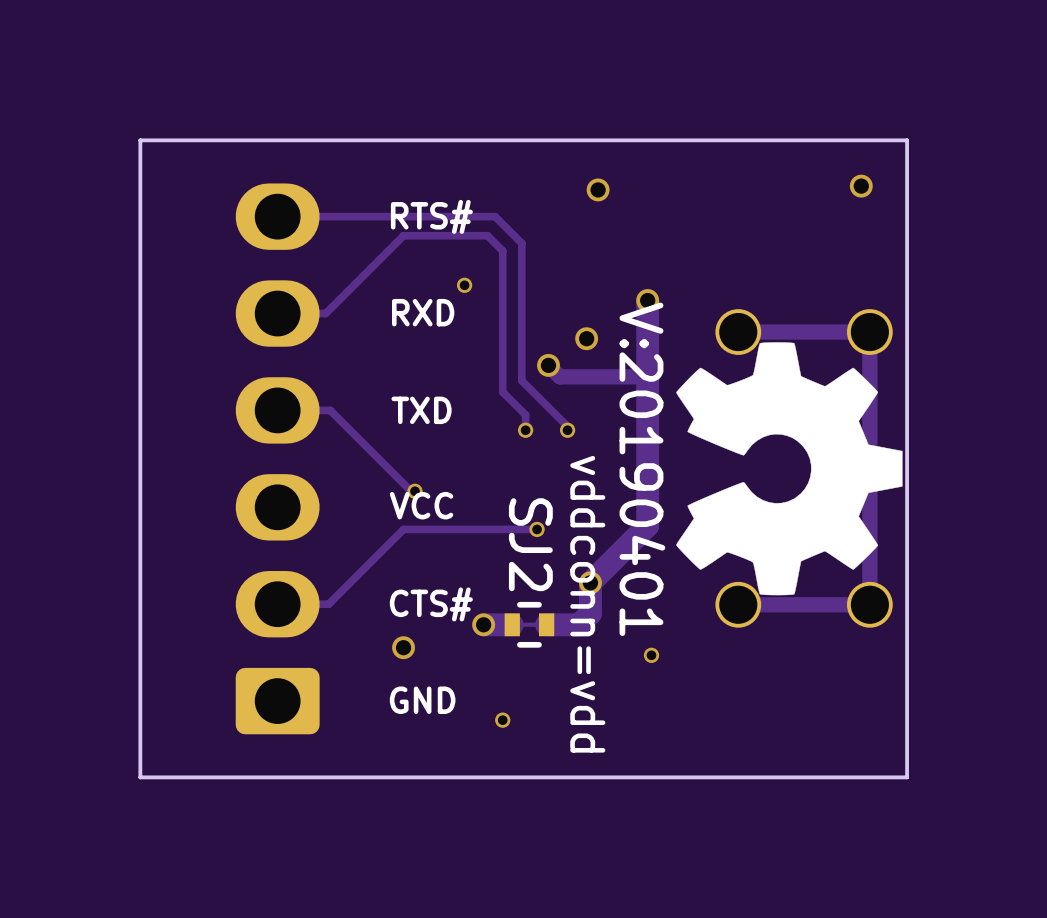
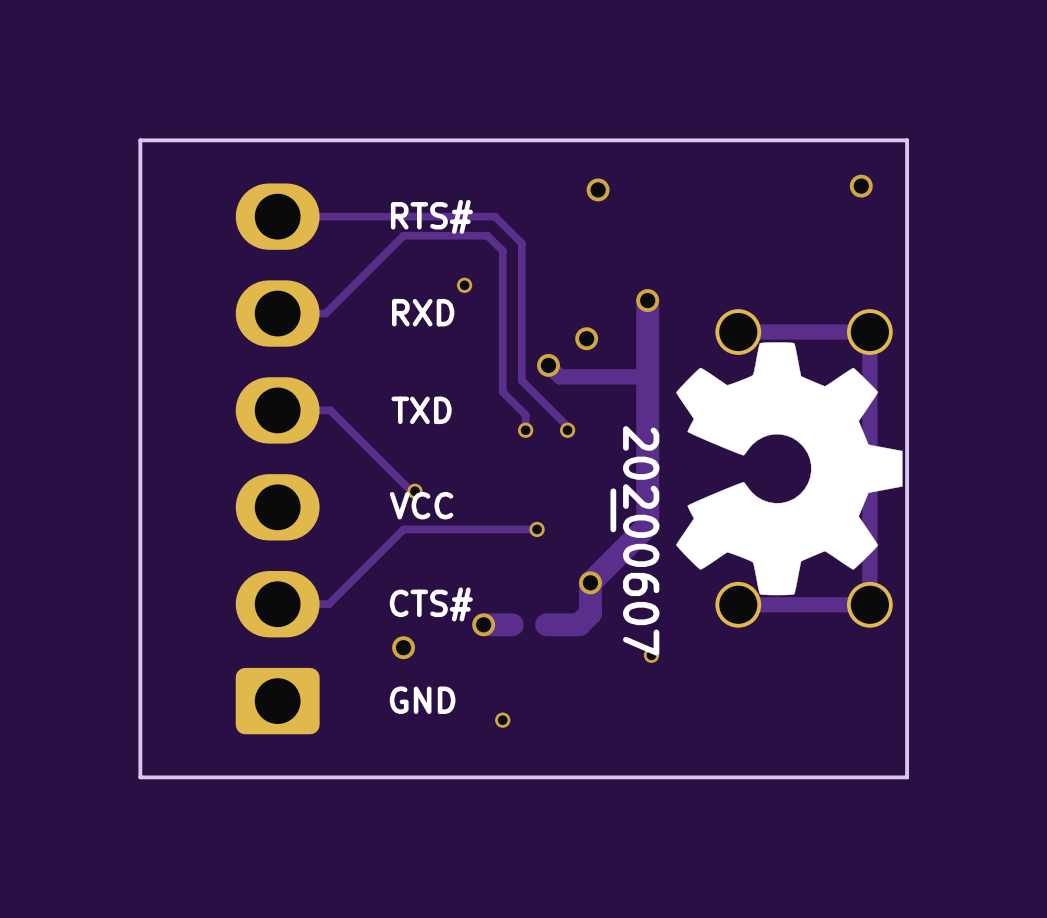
drawing: [619, 302, 666, 637] -> none
drawing: none -> [610, 488, 617, 533]
SJ2: vddconn=vdd (529, 624) -> none

